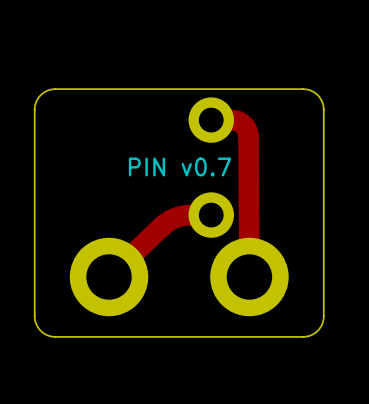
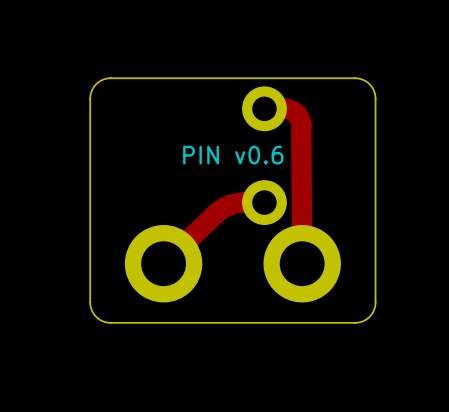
text: PIN v0.7 (180, 166) -> PIN v0.6 (233, 155)

